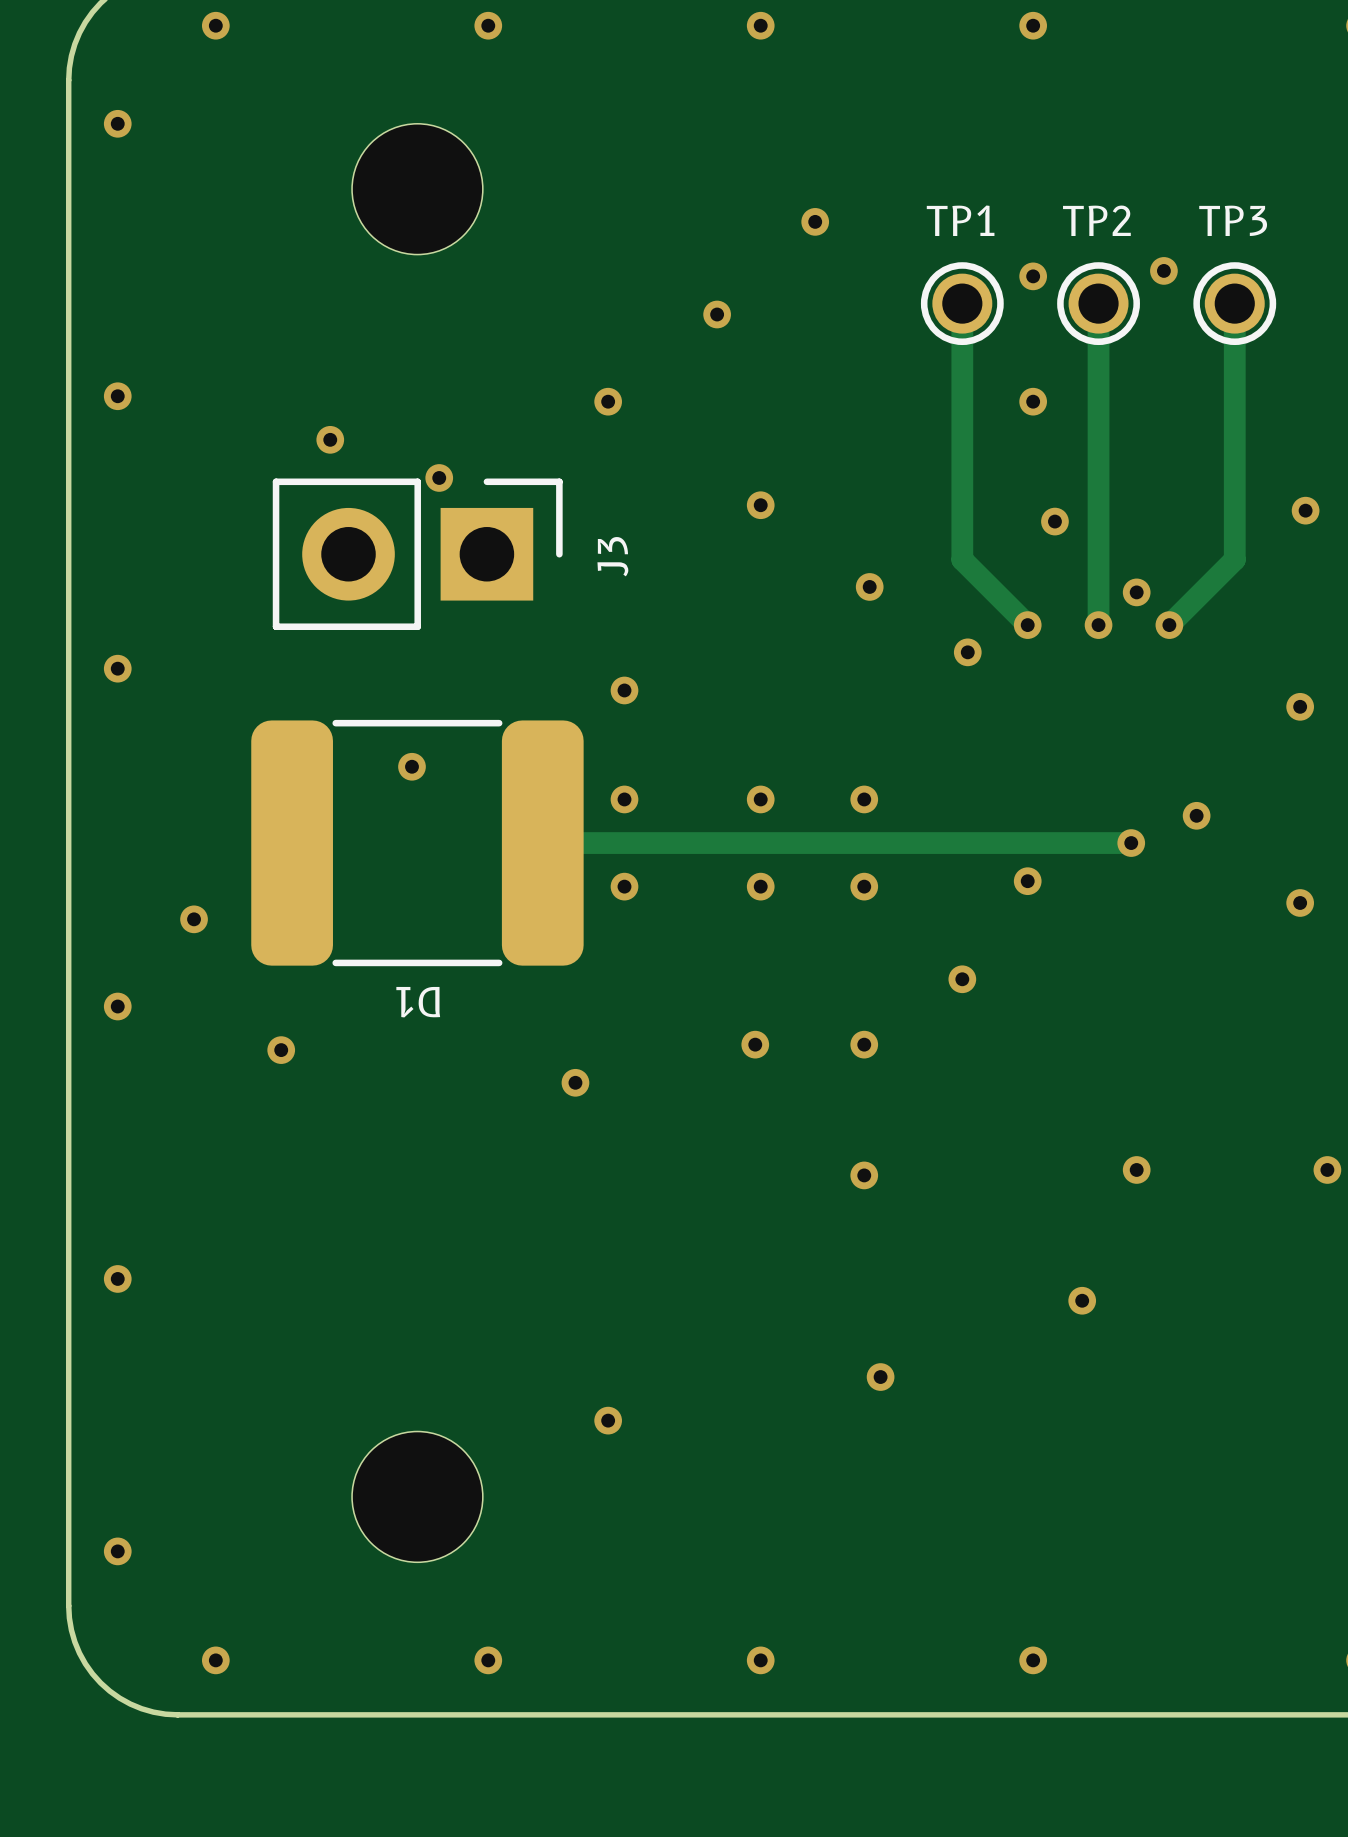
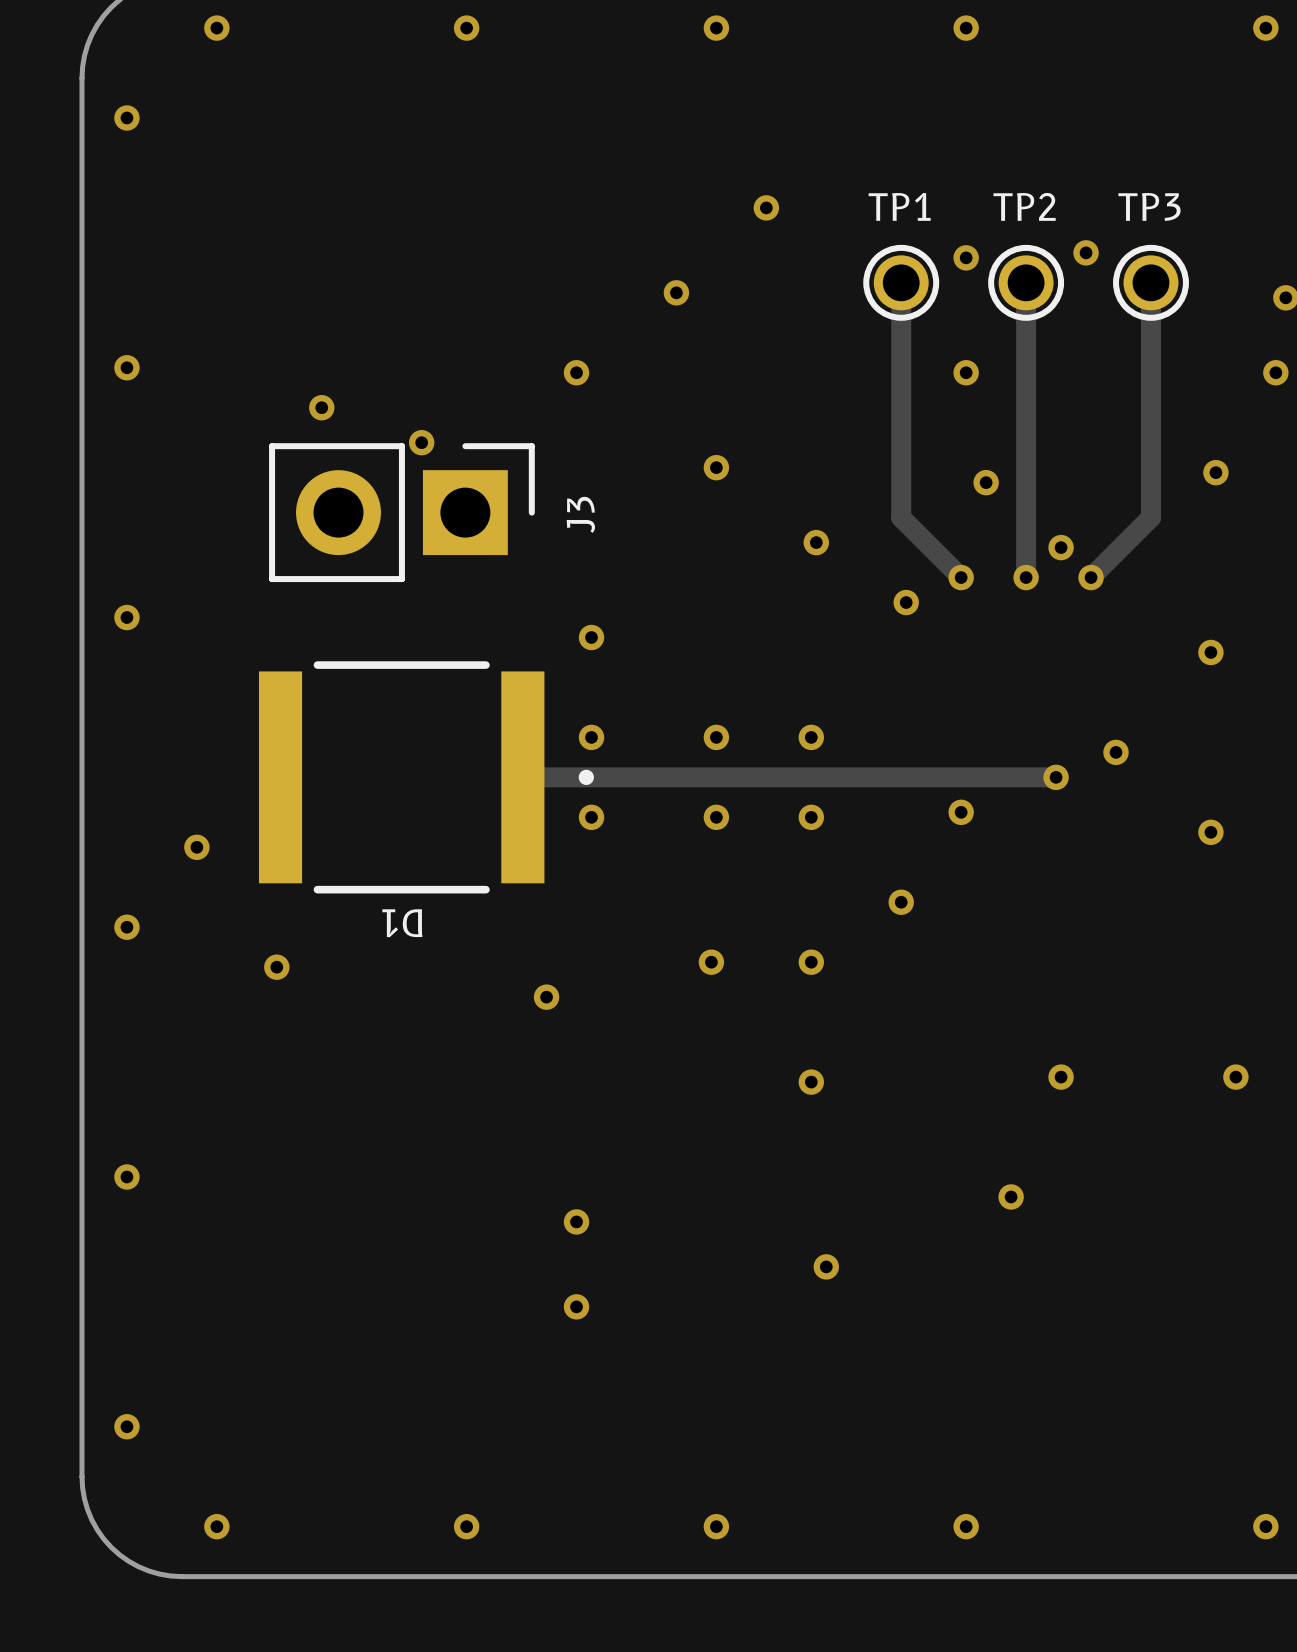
part: (417, 189) -> none
D1 footprint: [251, 719, 584, 967] -> [258, 661, 594, 894]
via: (411, 766) -> none
via: none -> (576, 1221)
part: (417, 1496) -> none

